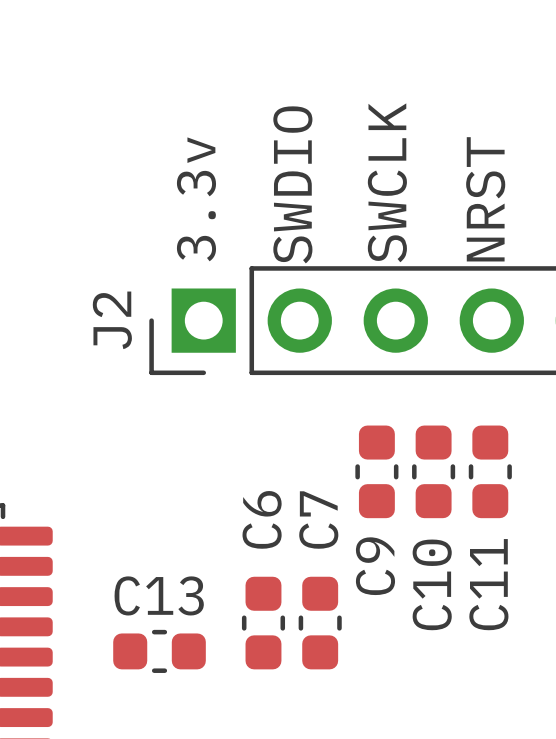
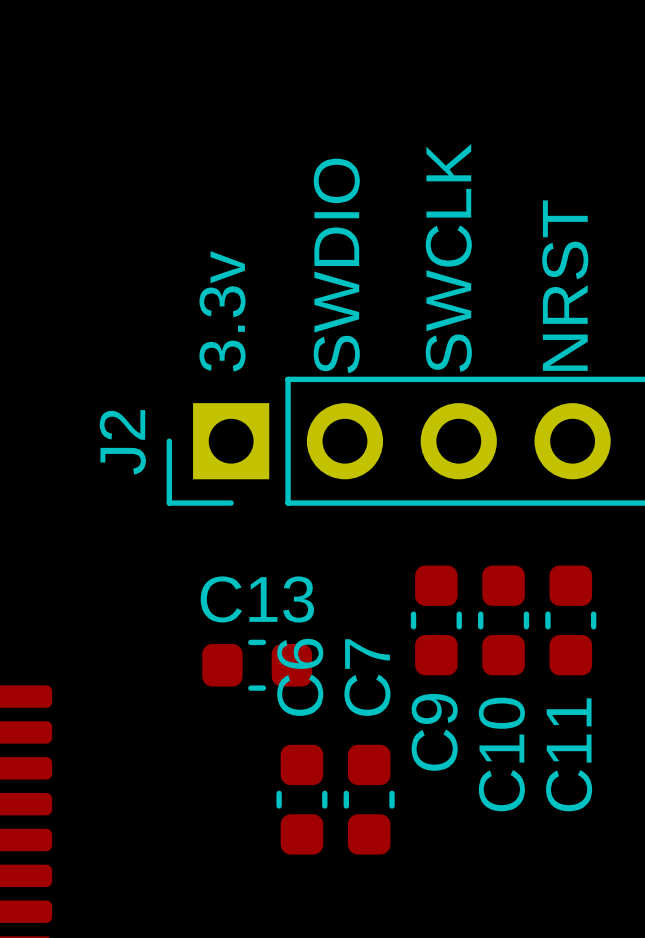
C13 position: (159, 651) -> (257, 665)

